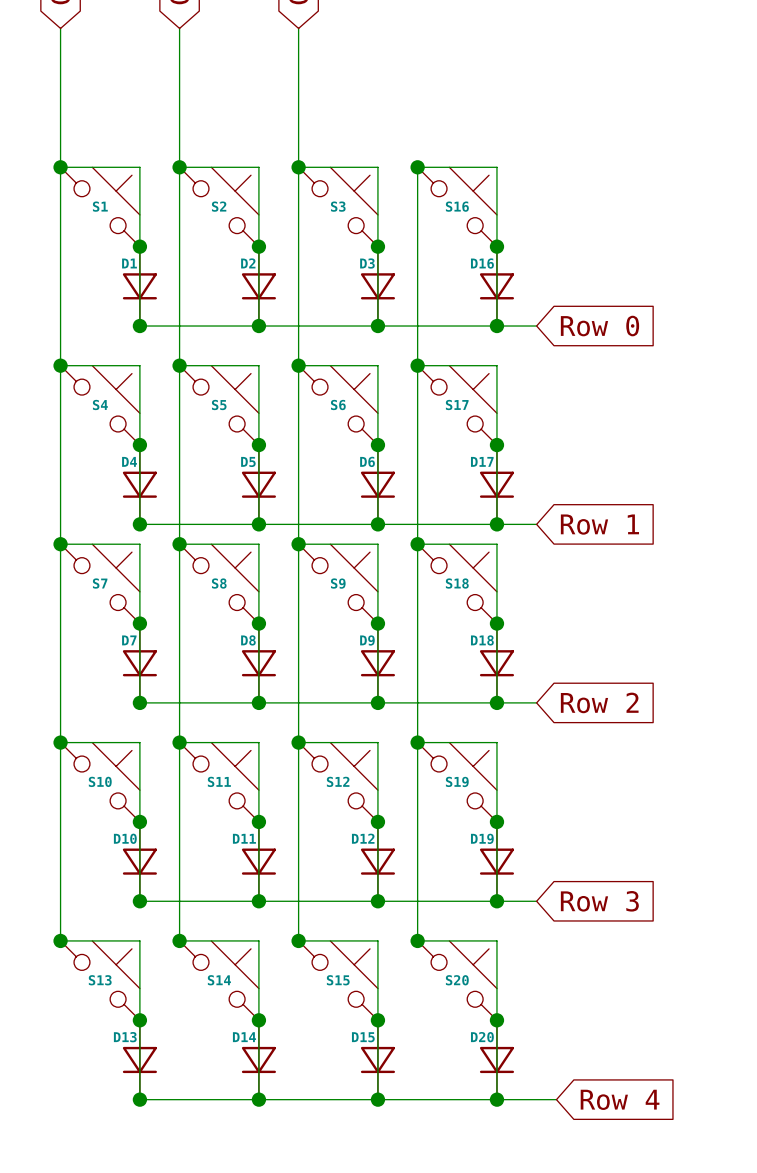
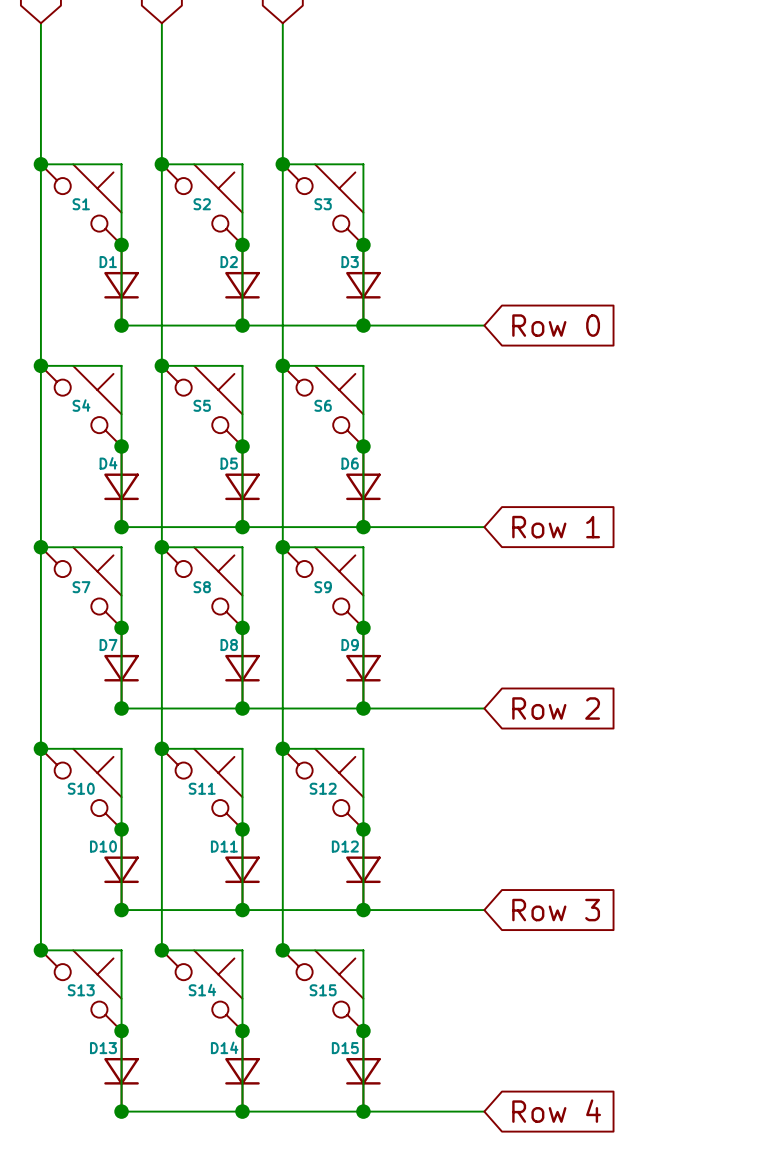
junction: (417, 167) -> none
S16: (457, 206) -> none
junction: (496, 246) -> none
D16: (496, 286) -> none
junction: (496, 326) -> none
wire: (536, 326) (496, 326) (496, 167) (417, 167) (417, 940) (496, 940) (496, 1099) (556, 1099) -> none
global label position: Row 0 (599, 326) -> Row 0 (556, 325)
wire: (417, 365) (496, 365) (496, 524) (536, 524) -> none
junction: (417, 365) -> none
S17: (457, 405) -> none
junction: (496, 445) -> none
D17: (496, 484) -> none
junction: (496, 524) -> none
global label position: Row 1 (599, 524) -> Row 1 (556, 527)
wire: (417, 544) (496, 544) (496, 702) (536, 702) -> none
junction: (417, 544) -> none
S18: (457, 583) -> none
junction: (496, 623) -> none
D18: (496, 663) -> none
junction: (496, 702) -> none
global label position: Row 2 (599, 702) -> Row 2 (556, 708)
wire: (417, 742) (496, 742) (496, 901) (536, 901) -> none
junction: (417, 742) -> none
S19: (457, 782) -> none
junction: (496, 821) -> none
D19: (496, 861) -> none
junction: (496, 901) -> none
global label position: Row 3 (599, 901) -> Row 3 (556, 910)
junction: (417, 940) -> none
S20: (457, 980) -> none
junction: (496, 1020) -> none
D20: (496, 1059) -> none
junction: (496, 1099) -> none
global label position: Row 4 (620, 1099) -> Row 4 (556, 1111)

